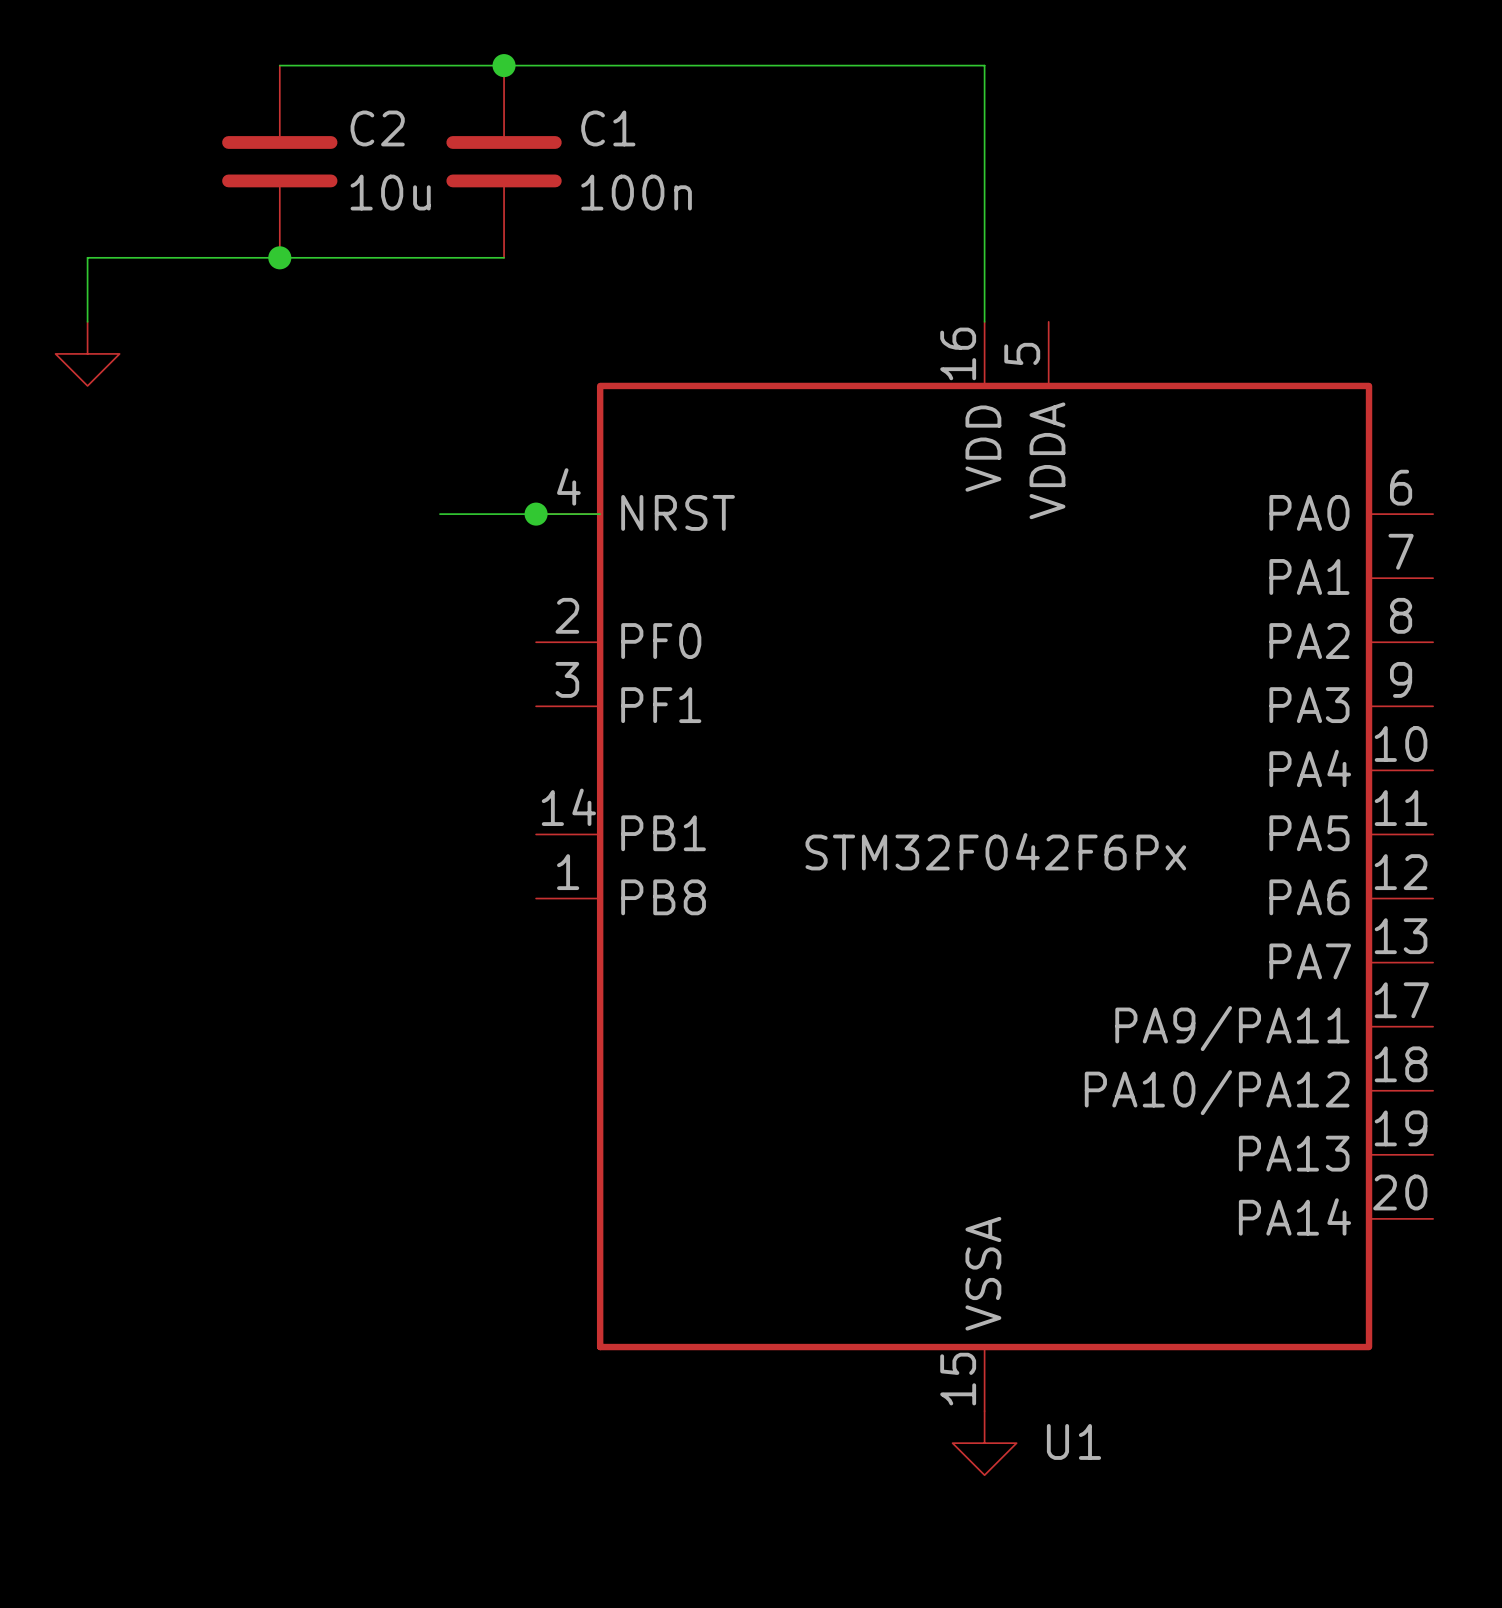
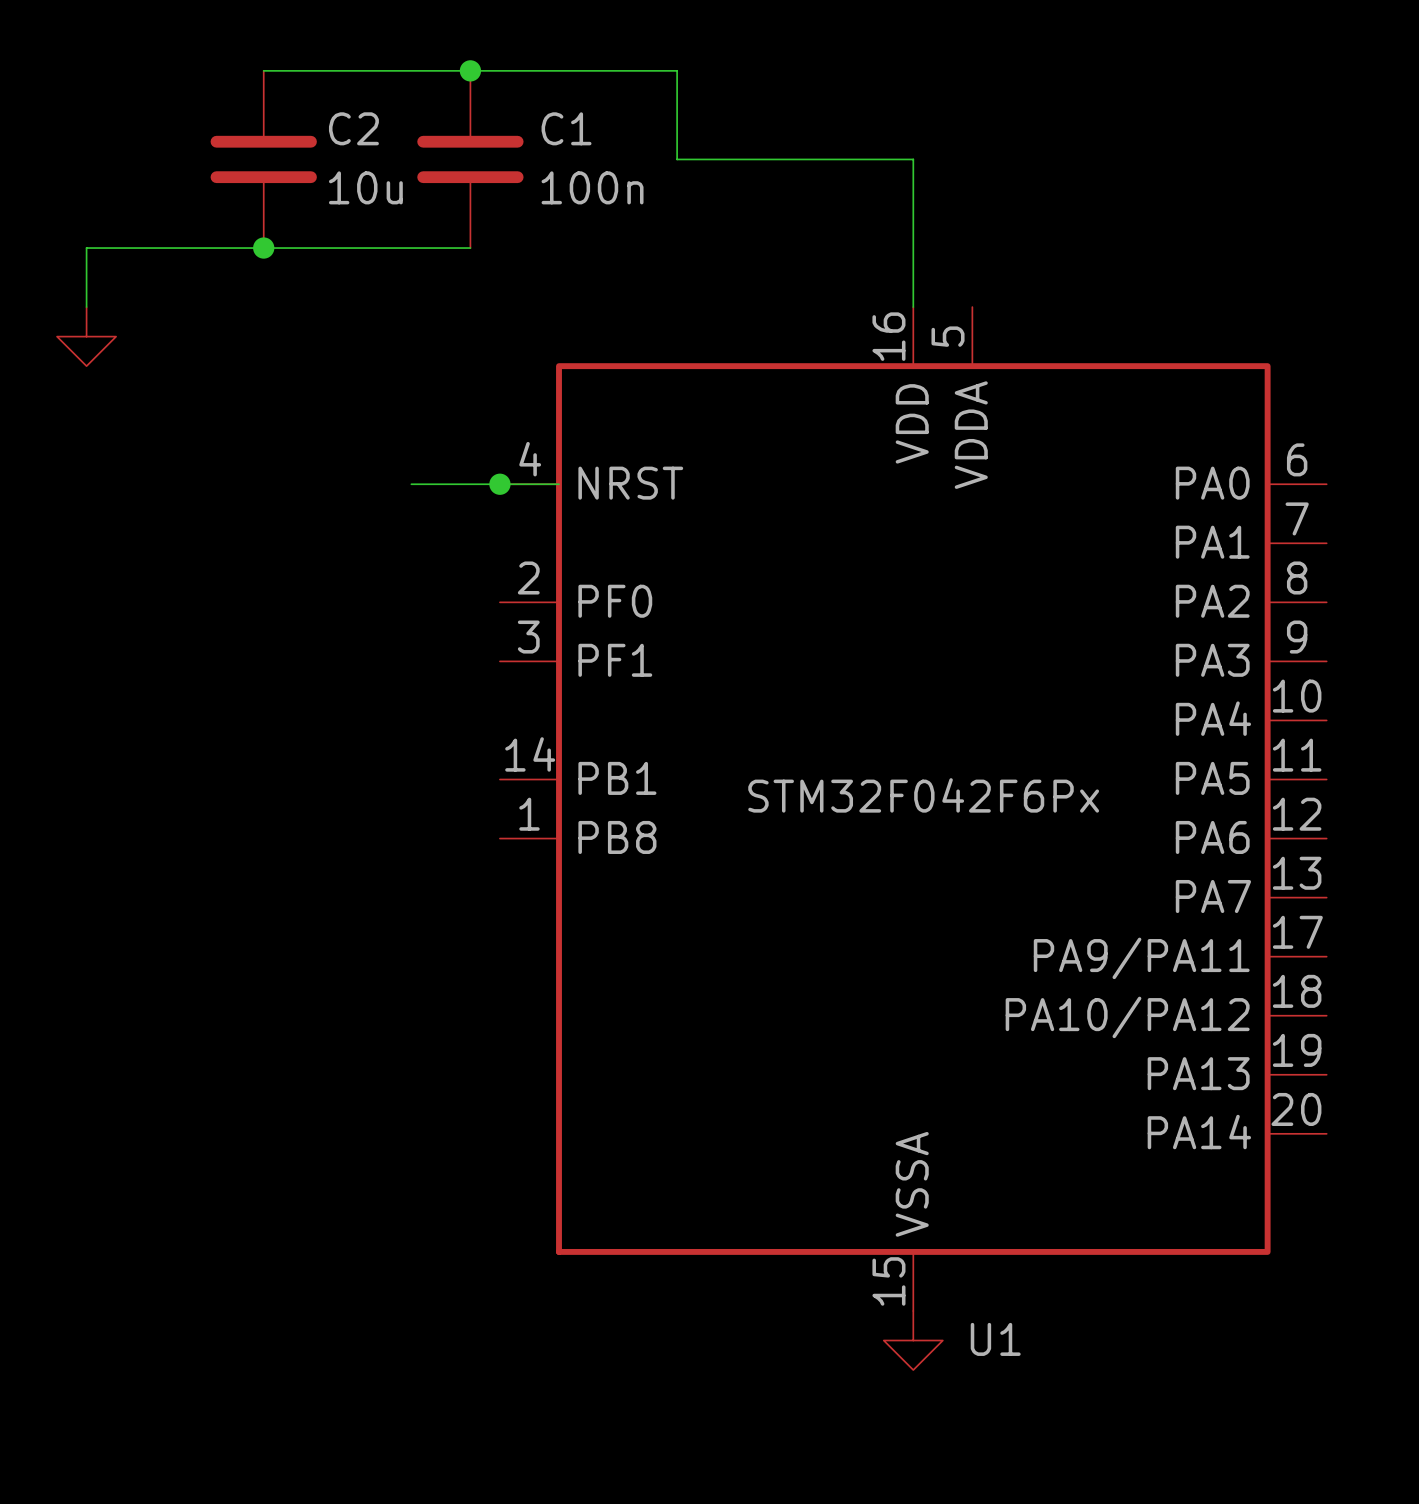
wire: (728, 65) (984, 65) (984, 161) -> (677, 70) (677, 159) (913, 159)

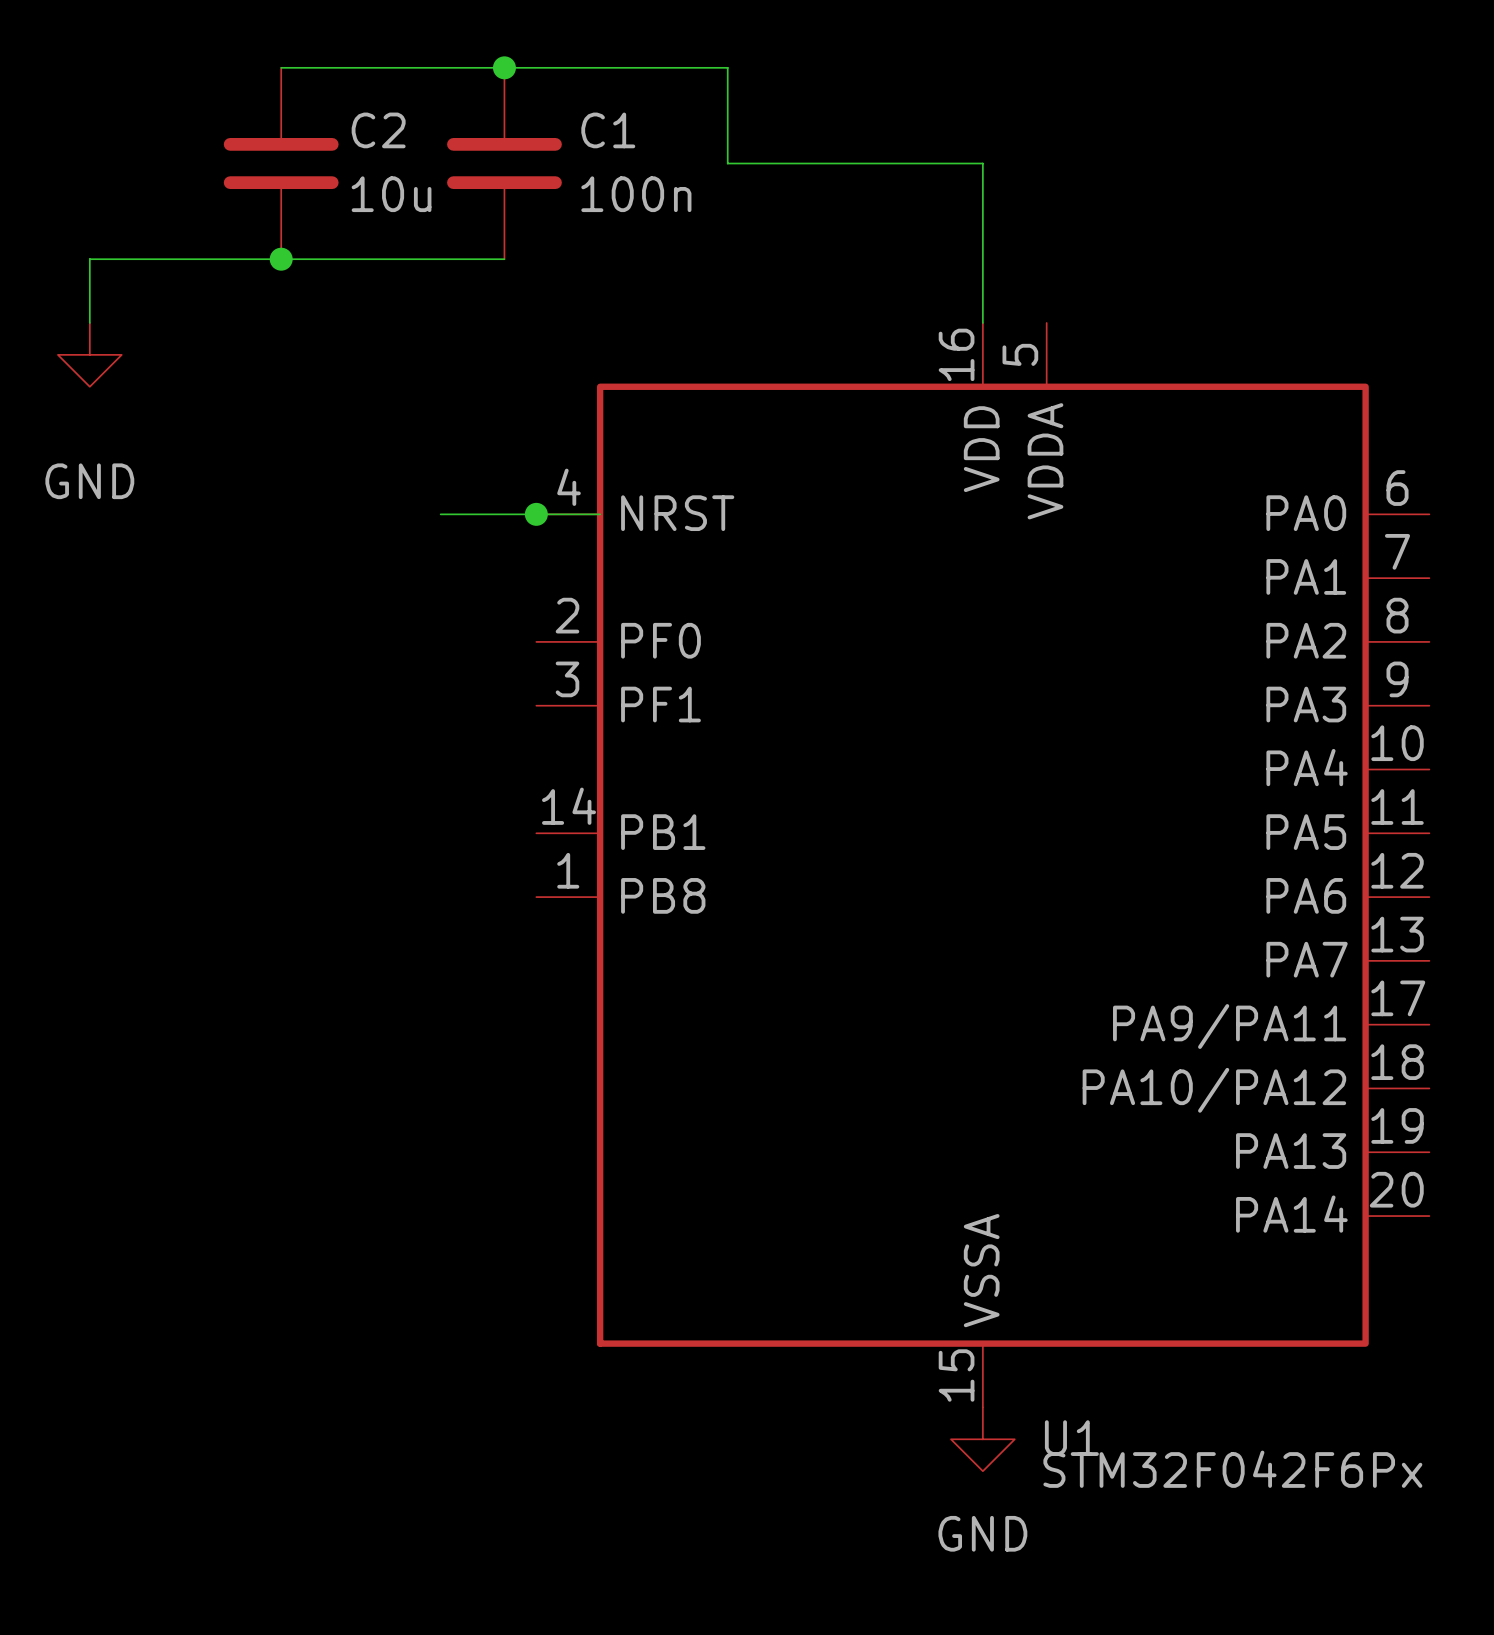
power symbol text: none -> GND (89, 481)
U1 value position: STM32F042F6Px (923, 795) -> STM32F042F6Px (1232, 1469)
power symbol text: none -> GND (982, 1533)

